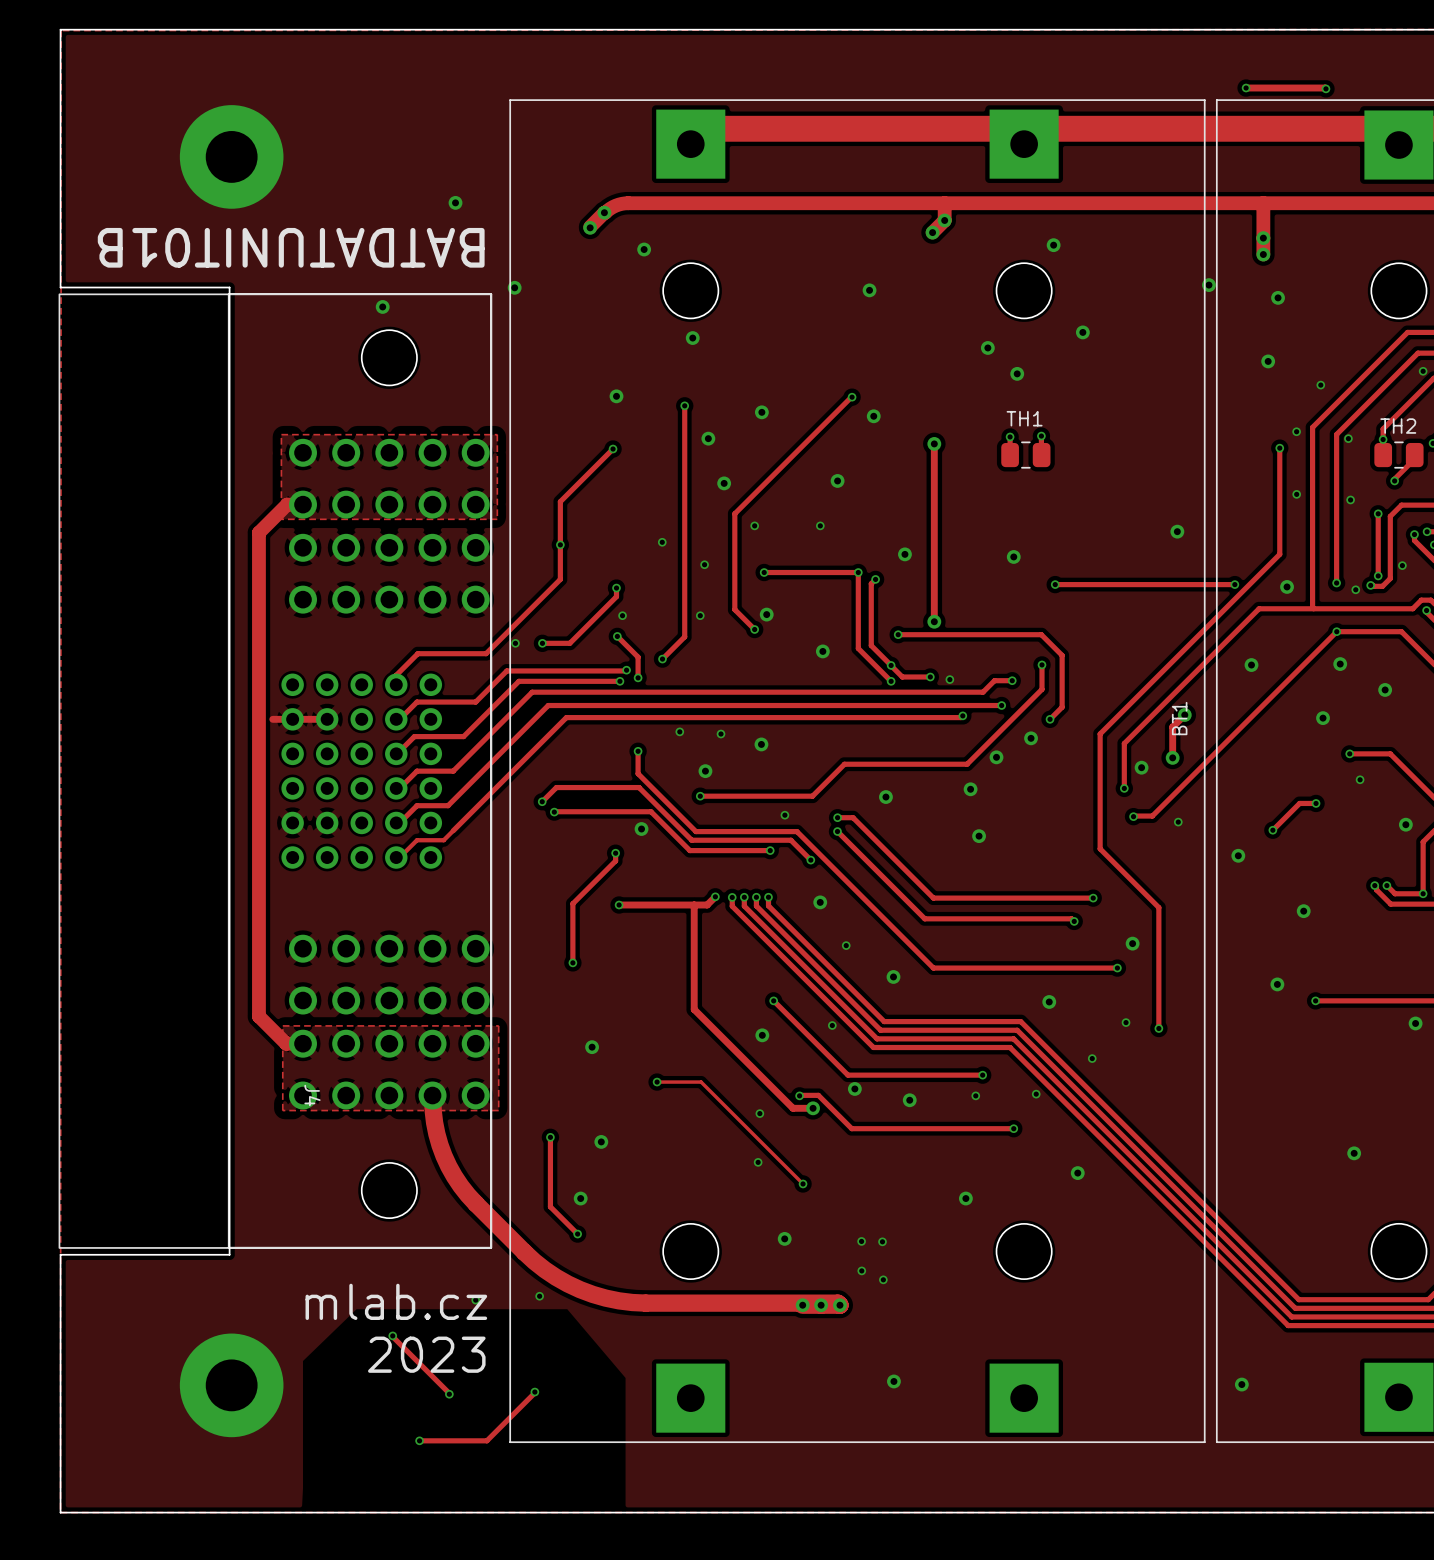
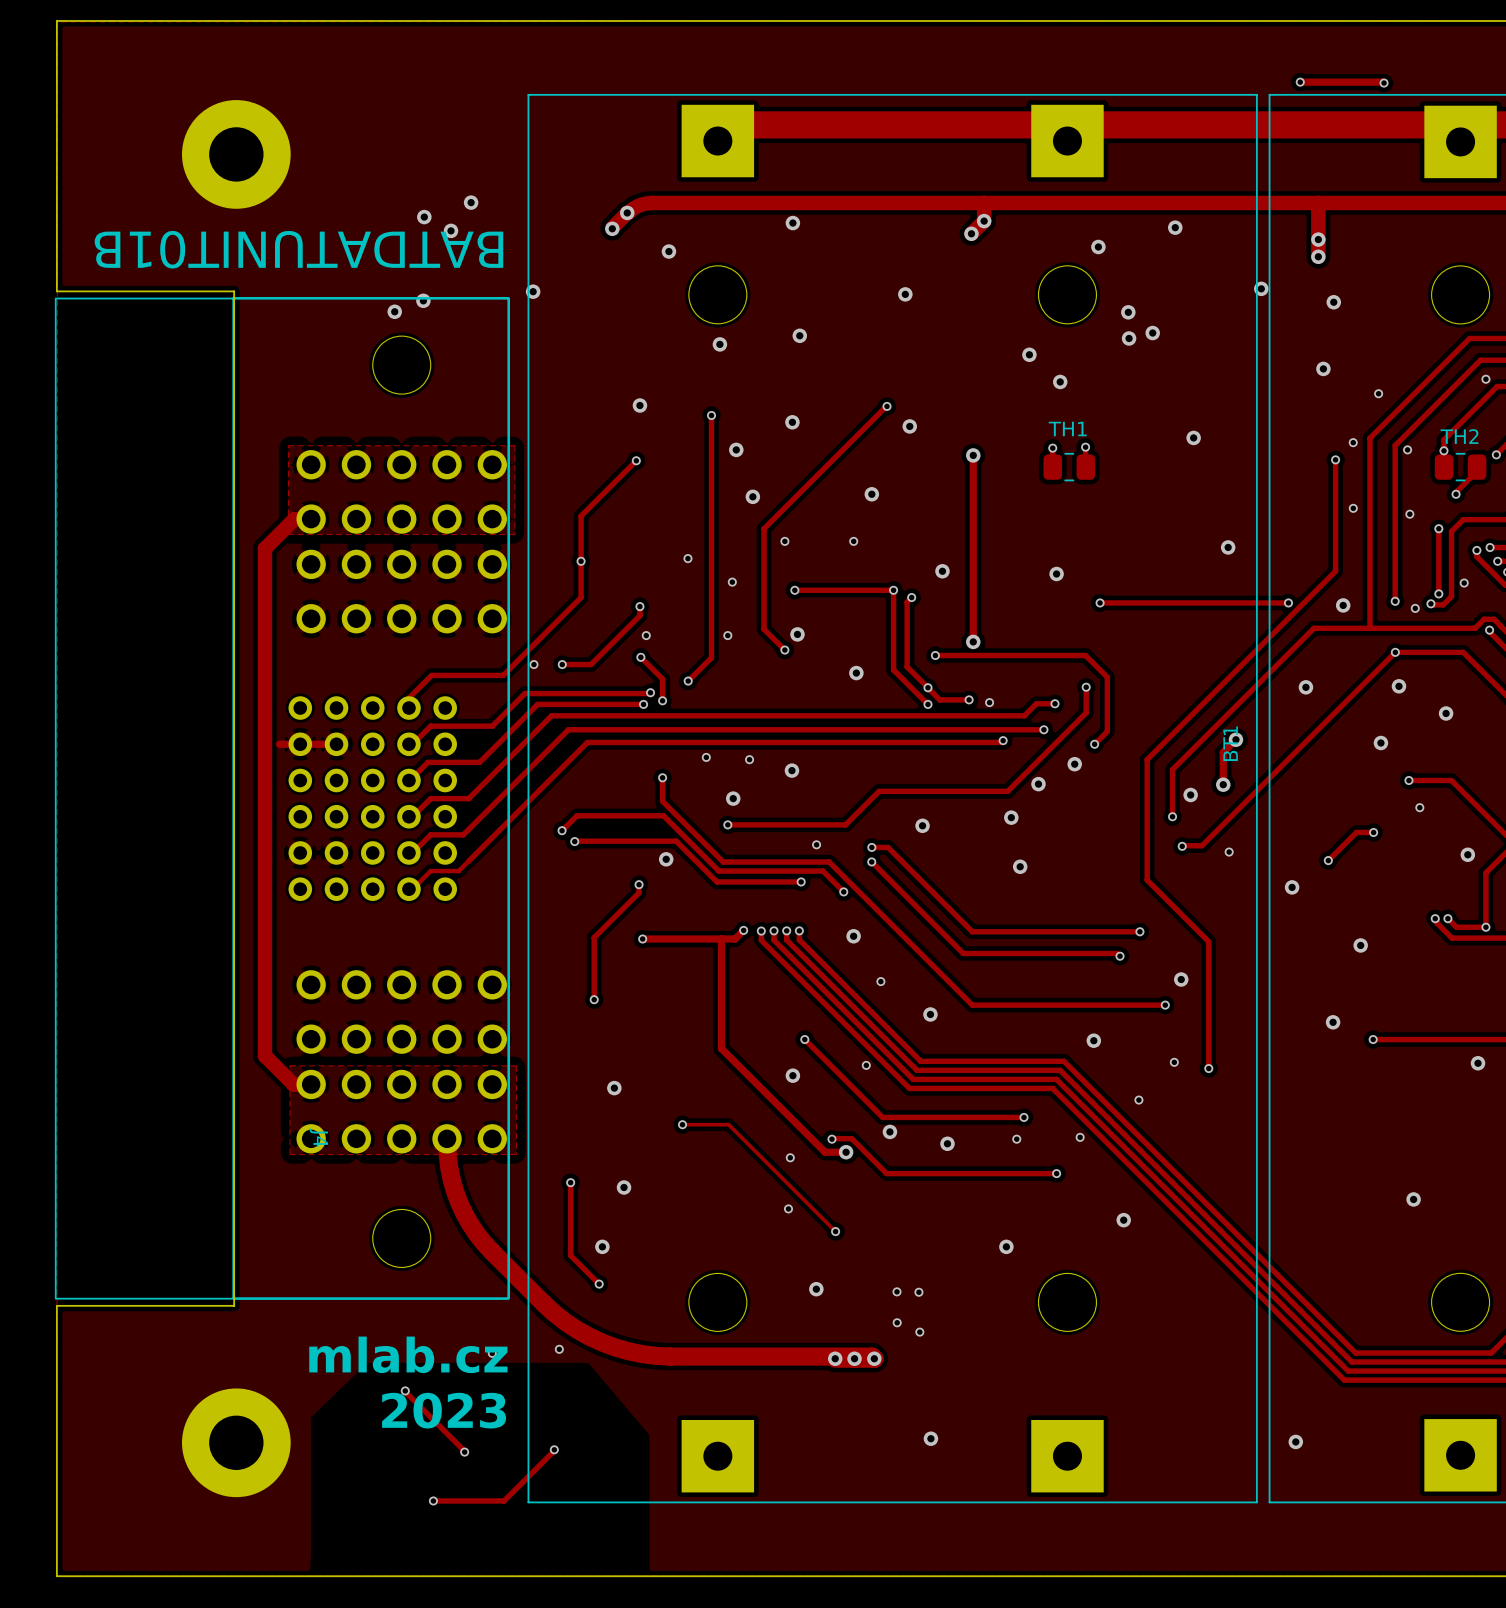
via: none -> (424, 217)
via: none -> (792, 223)
via: none -> (1175, 227)
via: none -> (451, 230)
via: none -> (423, 300)
via: none -> (1128, 312)
via: none -> (1152, 333)
via: none -> (799, 335)
via: none -> (1193, 437)

